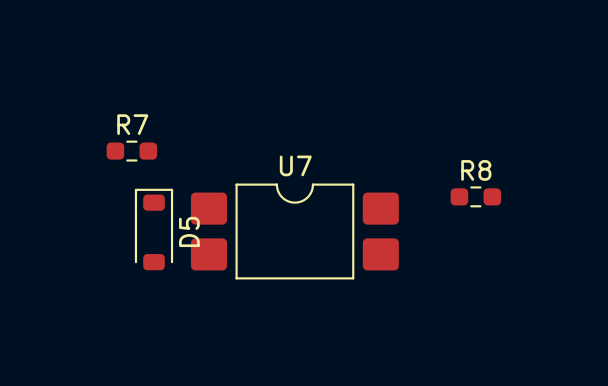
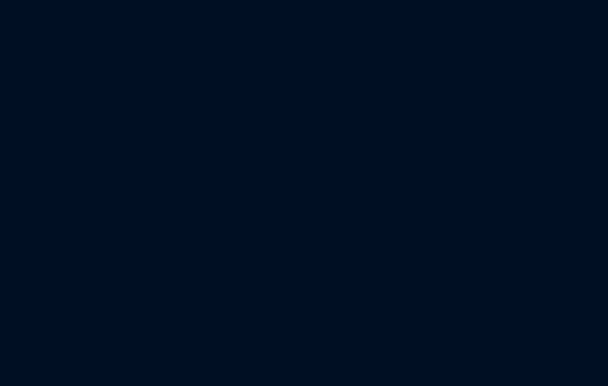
R7: (131, 151) -> none
R8: (475, 196) -> none
D5: (154, 229) -> none
U7: (294, 231) -> none

